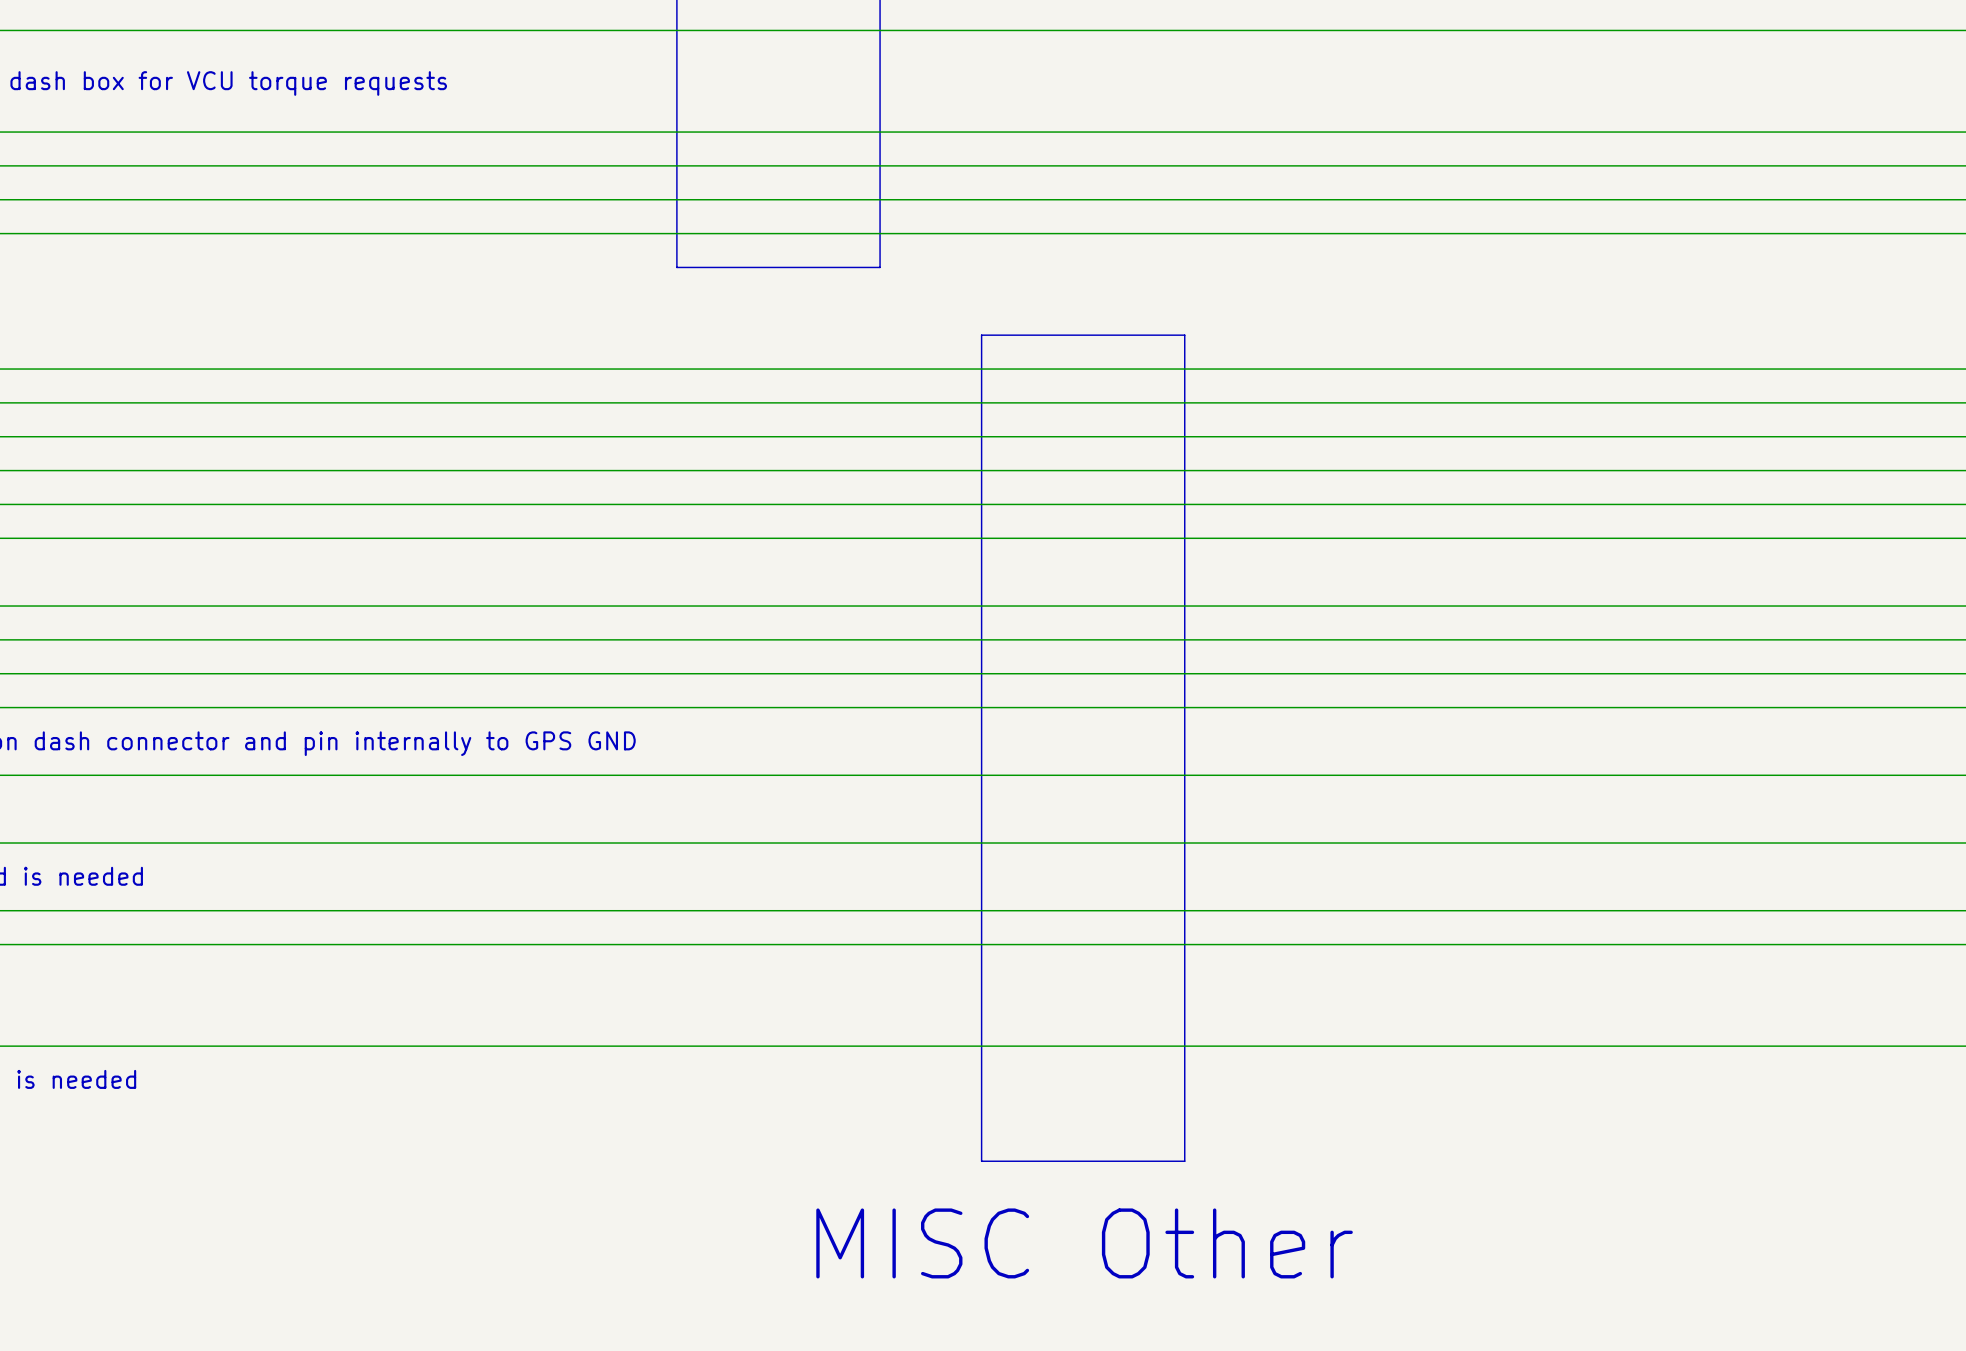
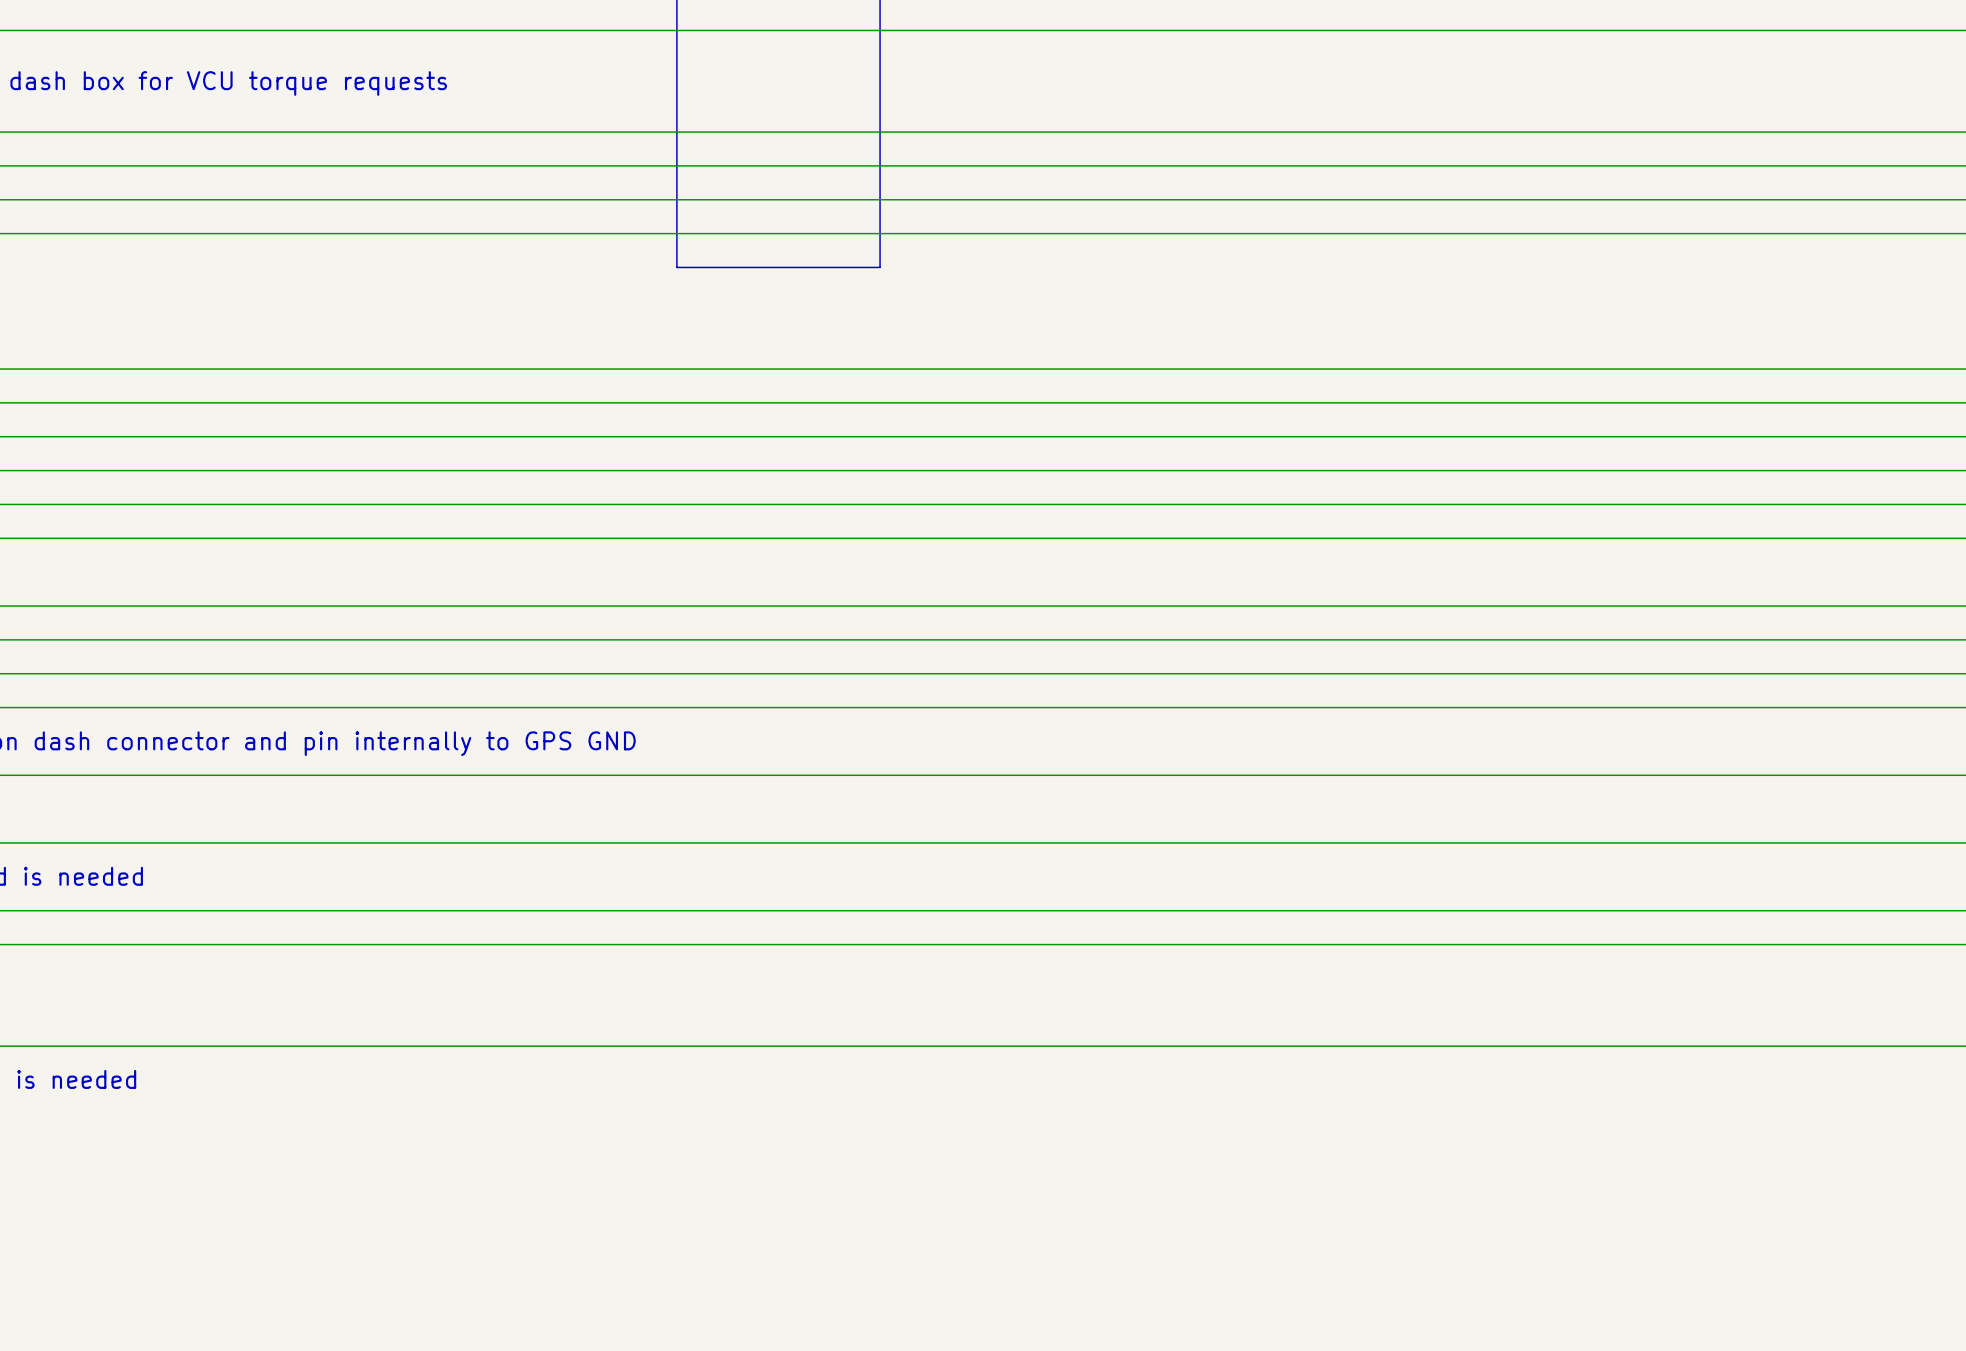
line: (981, 335) (1184, 335) (1184, 1161) (981, 1161) (981, 335) -> none
text: MISC Other (1084, 1243) -> none

